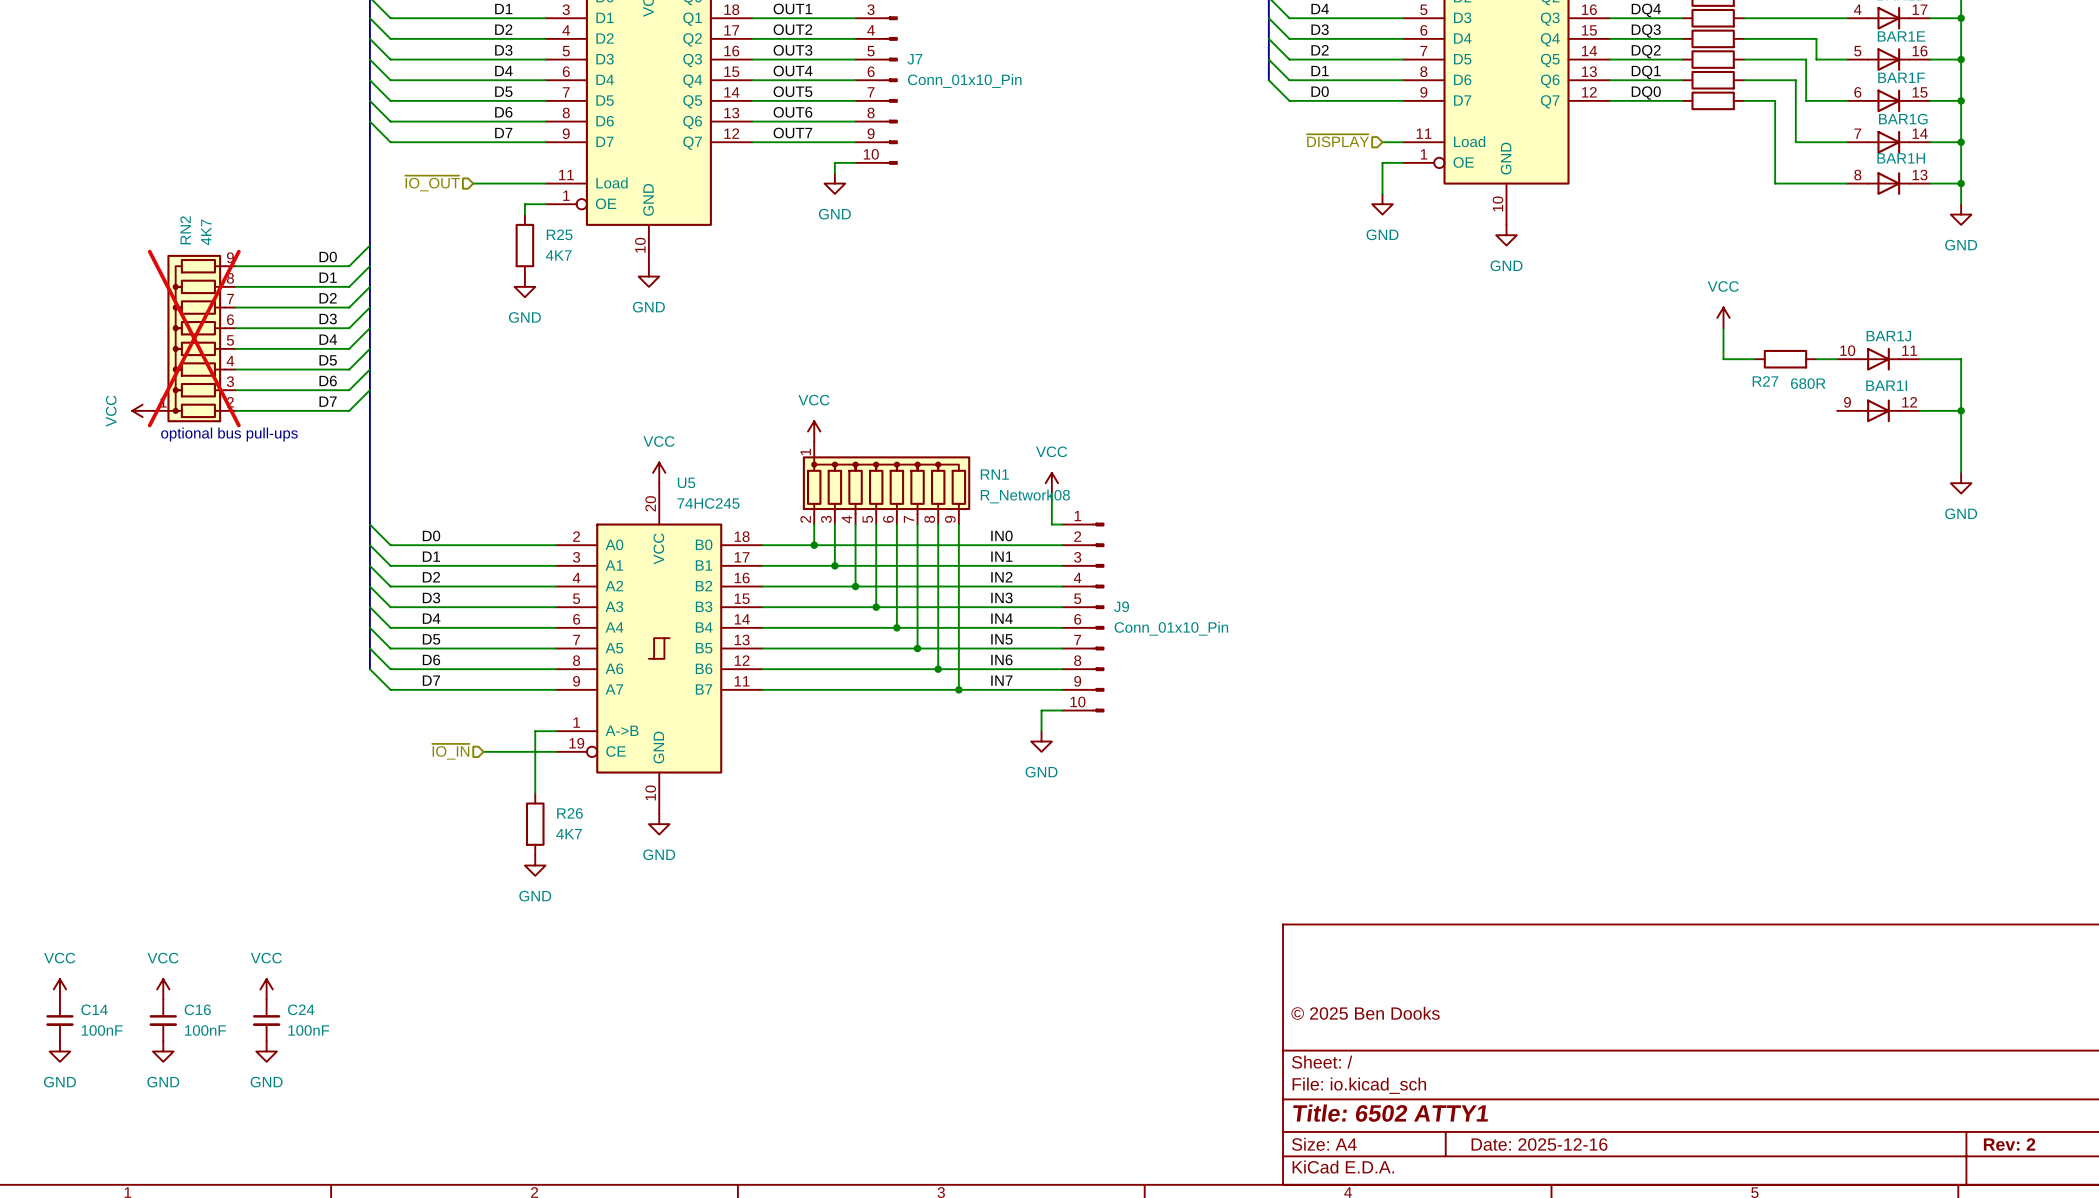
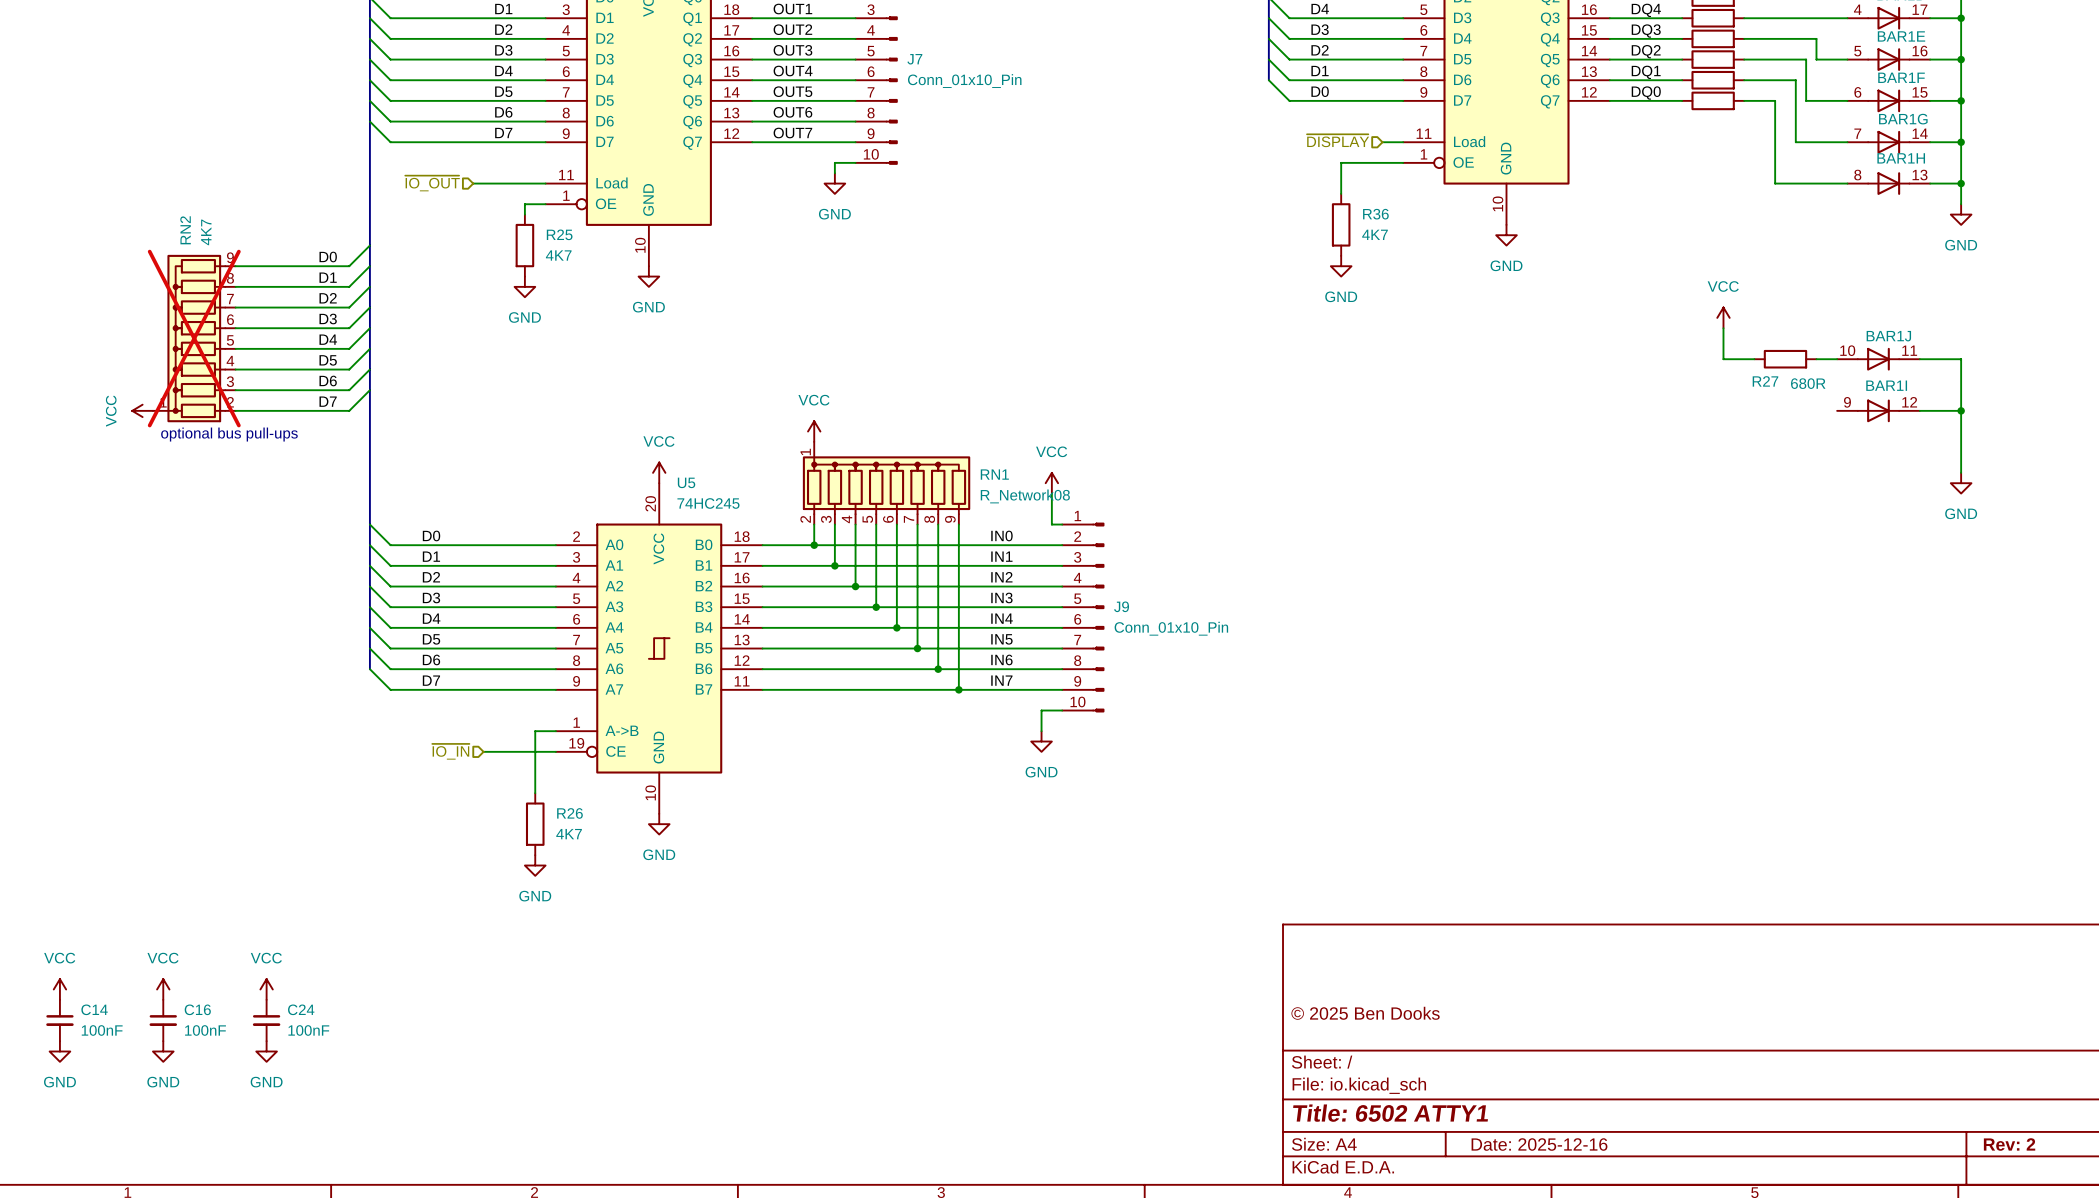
wire: (1382, 162) (1382, 193) -> (1382, 162) (1341, 162) (1341, 193)
power symbol position: GND (1382, 204) -> GND (1341, 266)
R36: none -> 4K7 (1341, 224)

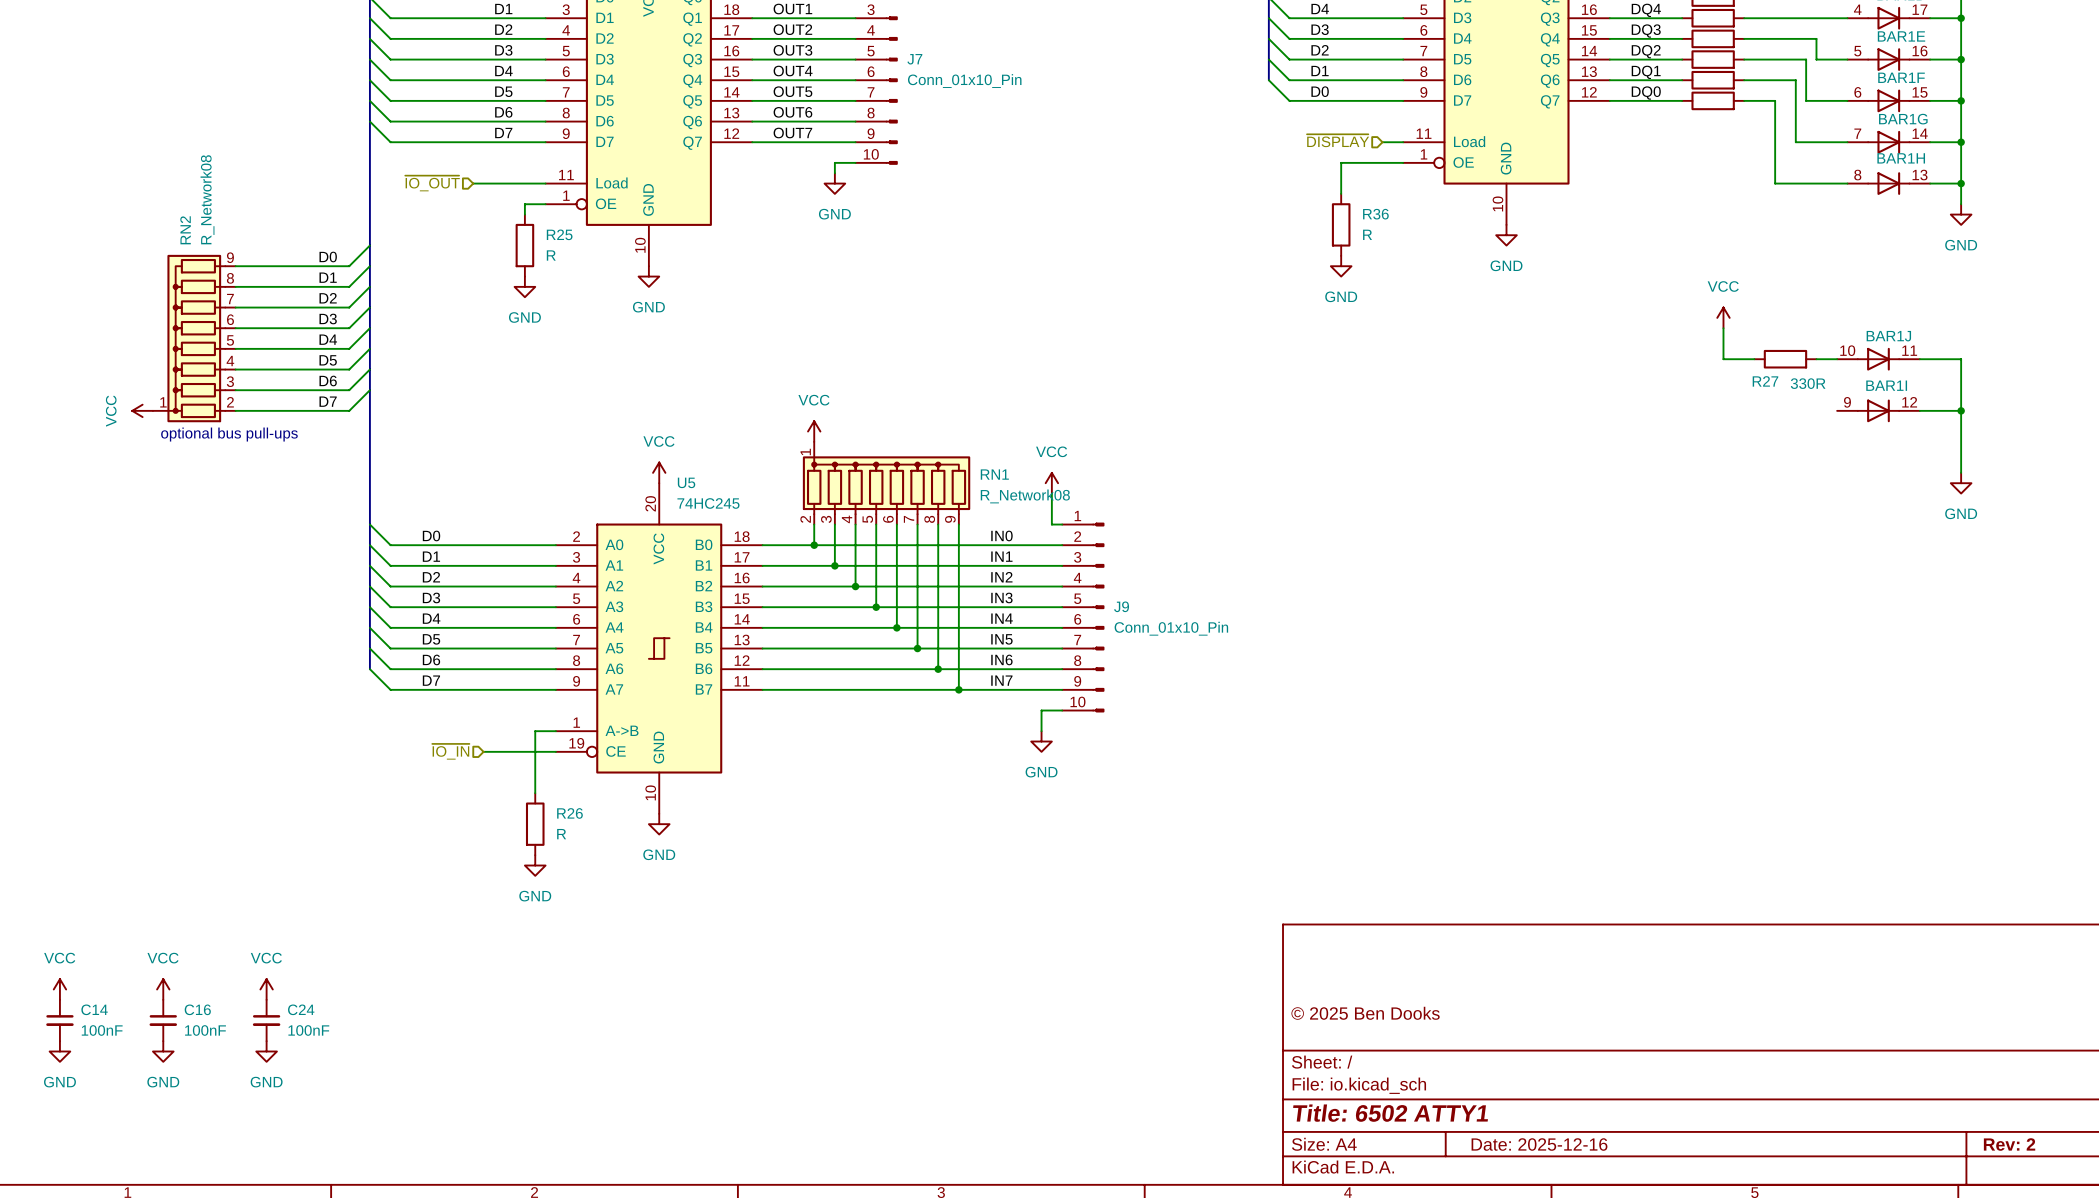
RN2 value: 4K7 (206, 232) -> R_Network08 (207, 199)
R36 value: 4K7 (1375, 234) -> R (1367, 234)
R25 value: 4K7 (558, 255) -> R (551, 255)
RN2 do-not-place cross: (194, 338) -> none
R27 value: 680R (1808, 383) -> 330R (1808, 383)
R26 value: 4K7 (569, 834) -> R (561, 834)

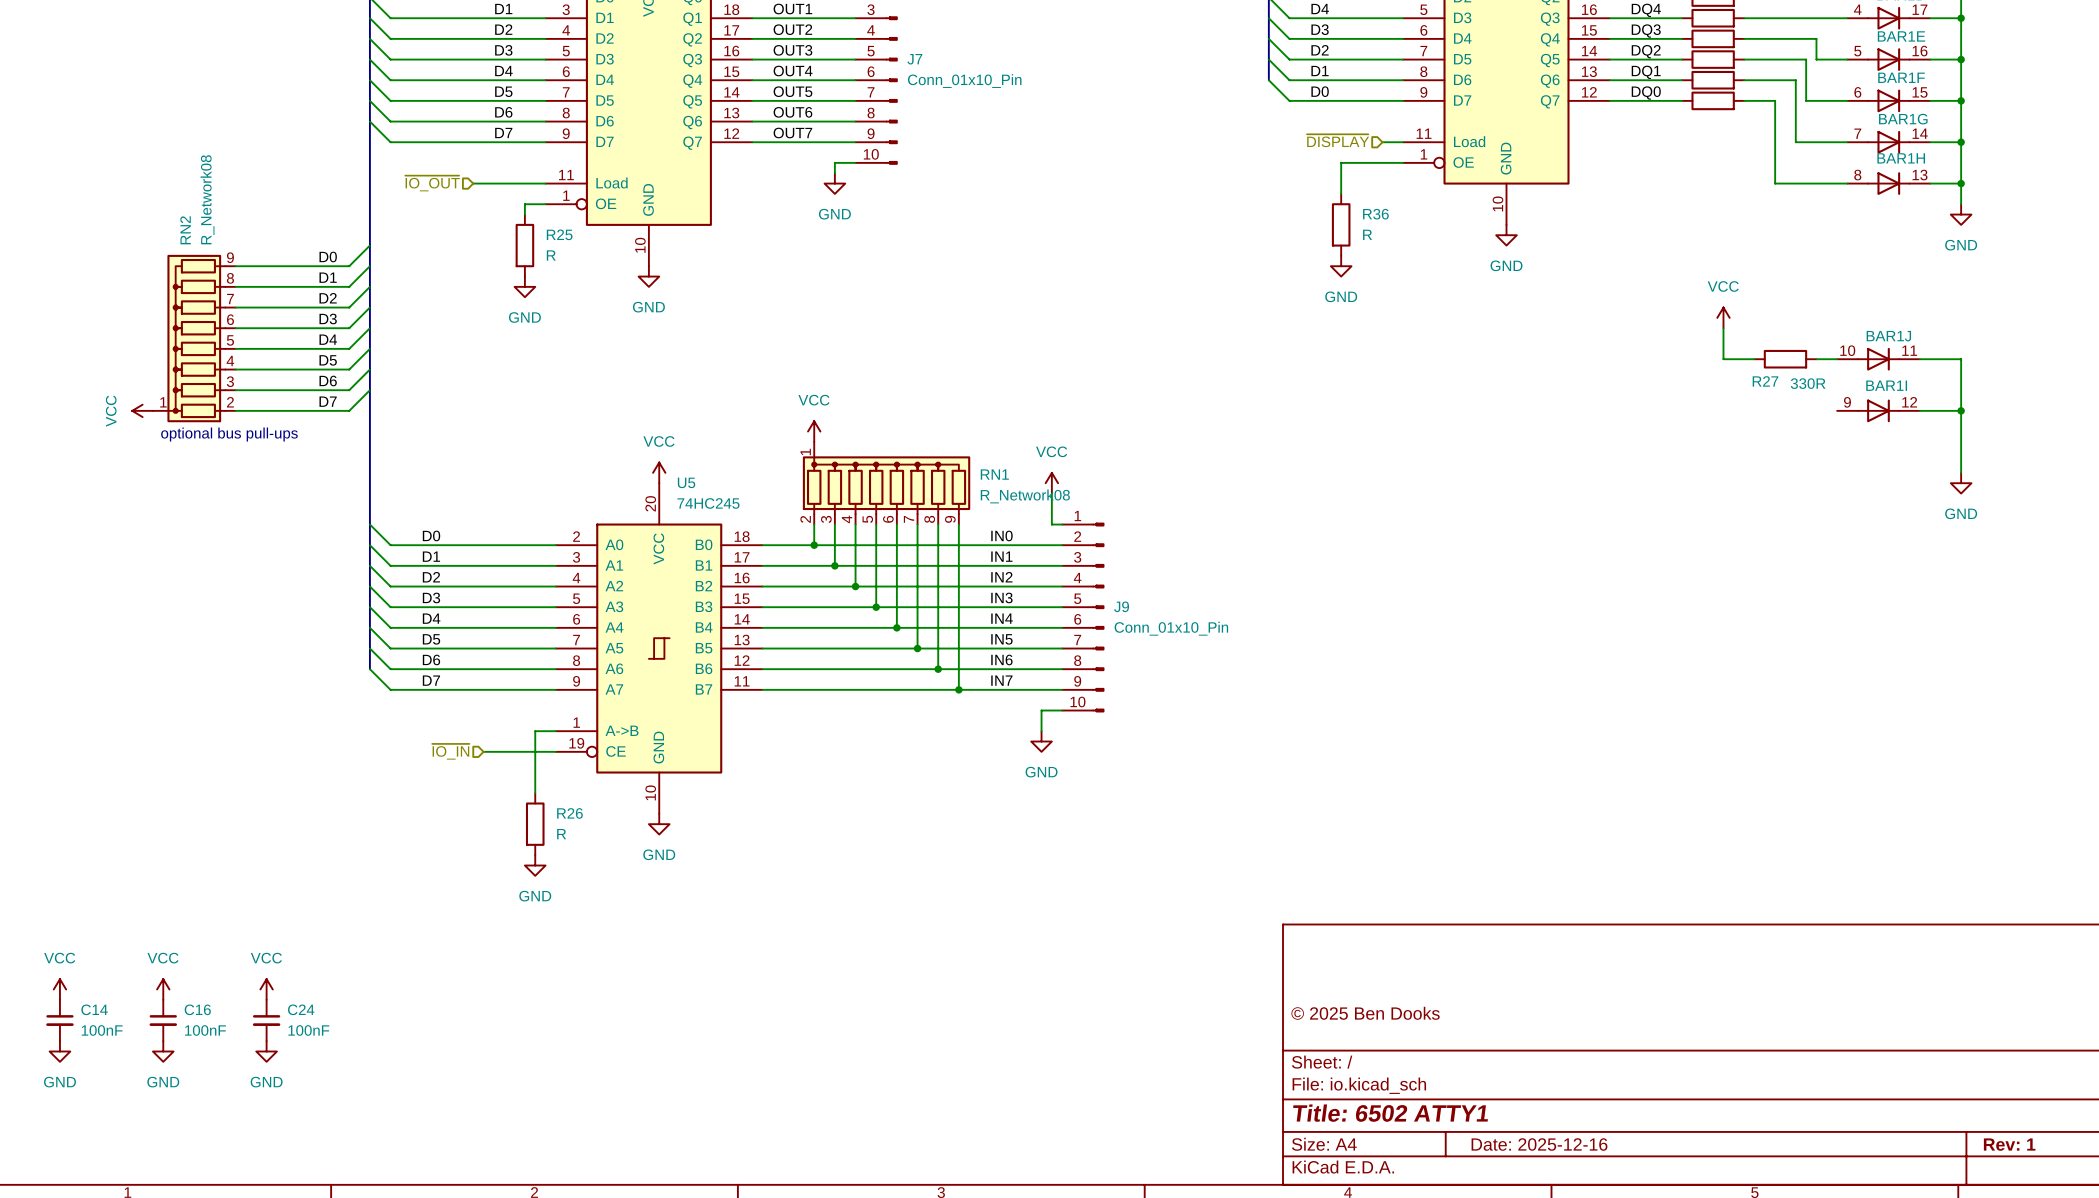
title block: Rev: 2 (2009, 1144) -> Rev: 1 (2009, 1144)

